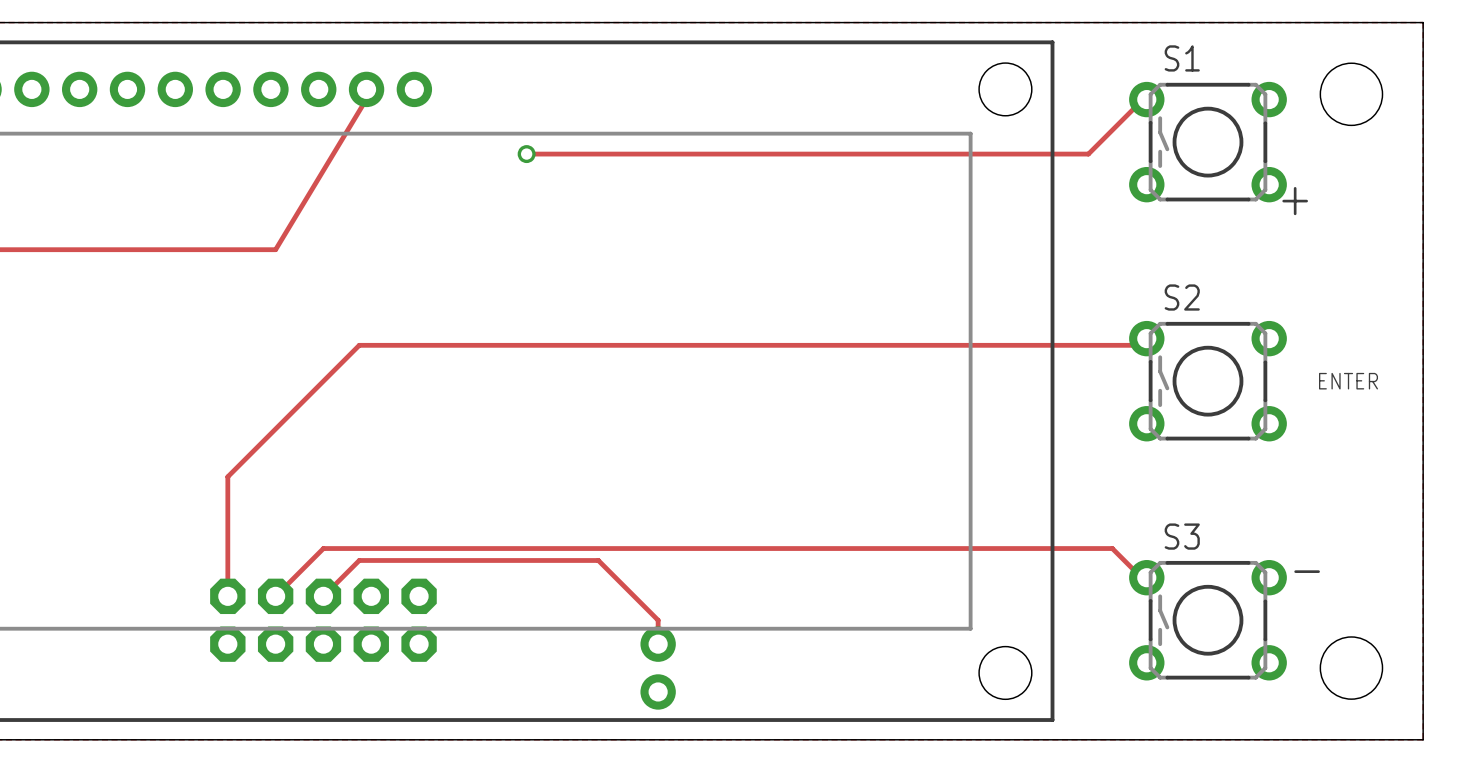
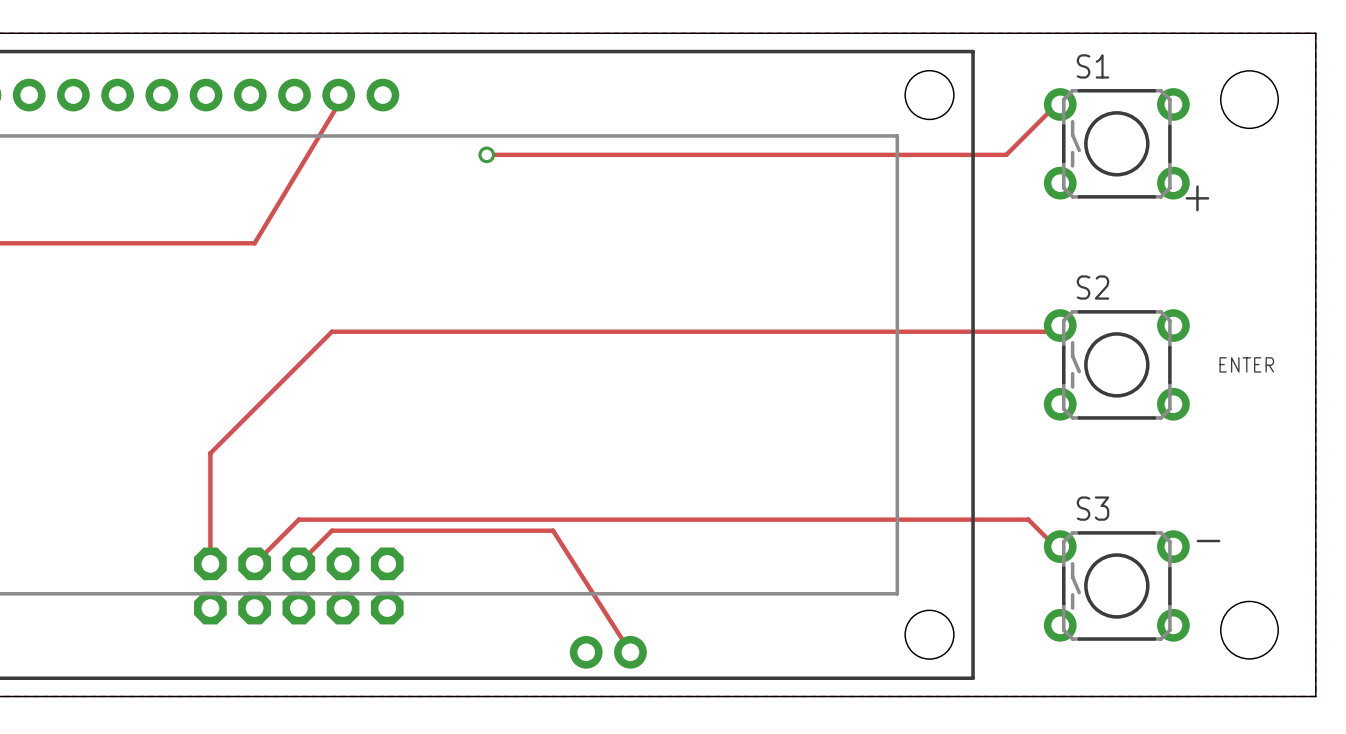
track: (598, 560) (658, 620) (658, 644) -> (553, 530) (630, 652)
part rotation: 0° (658, 668) -> 90° clockwise (608, 652)

